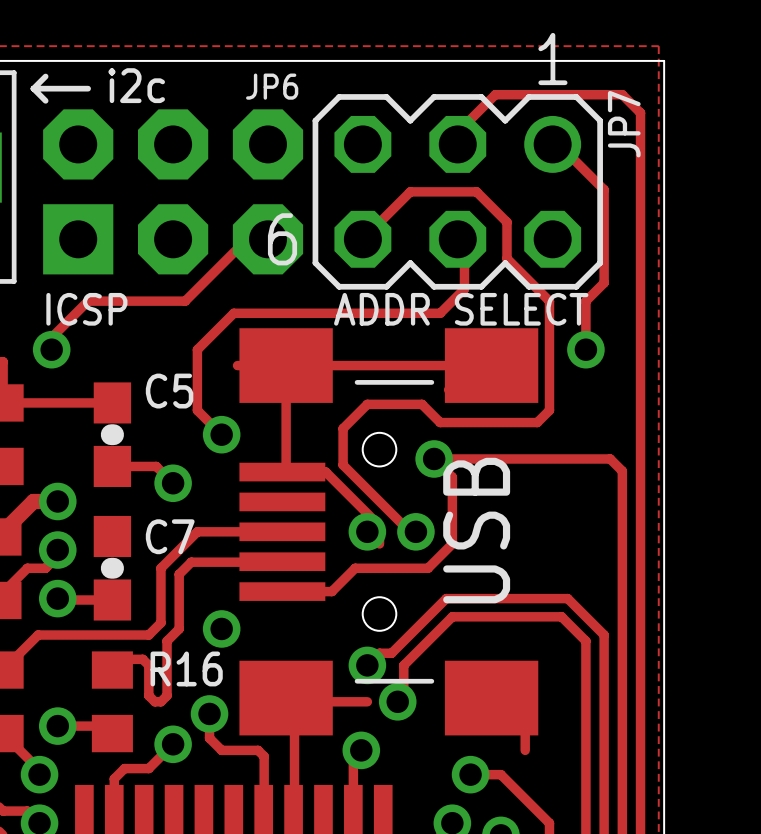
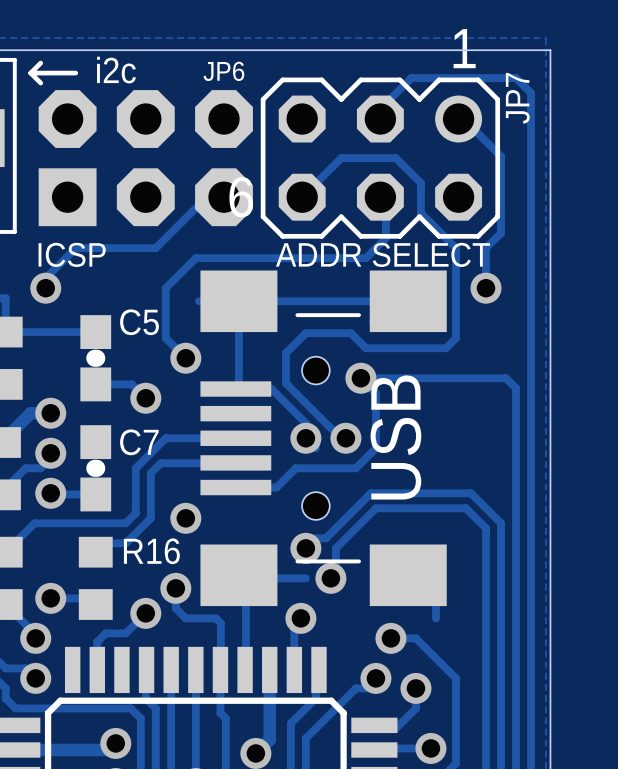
track: (167, 641) (167, 695) (160, 701) (154, 701) (148, 695) (148, 665) (142, 659) -> (140, 528) (125, 543) (120, 543)

